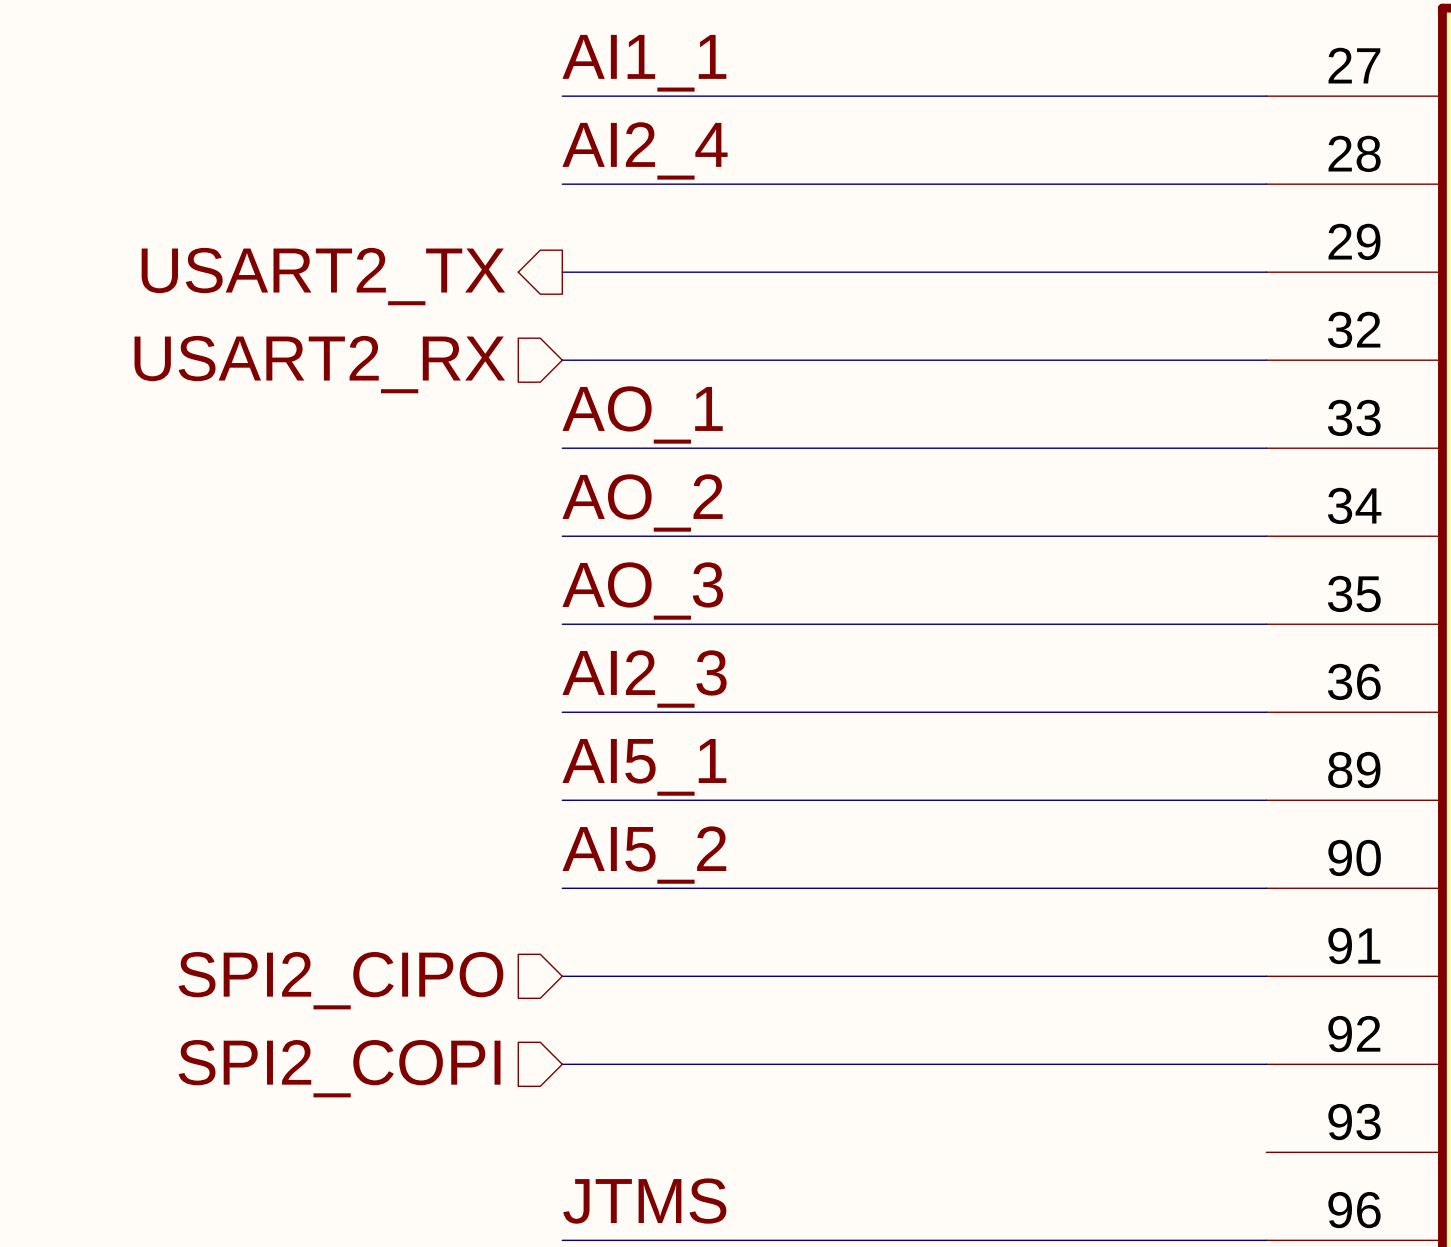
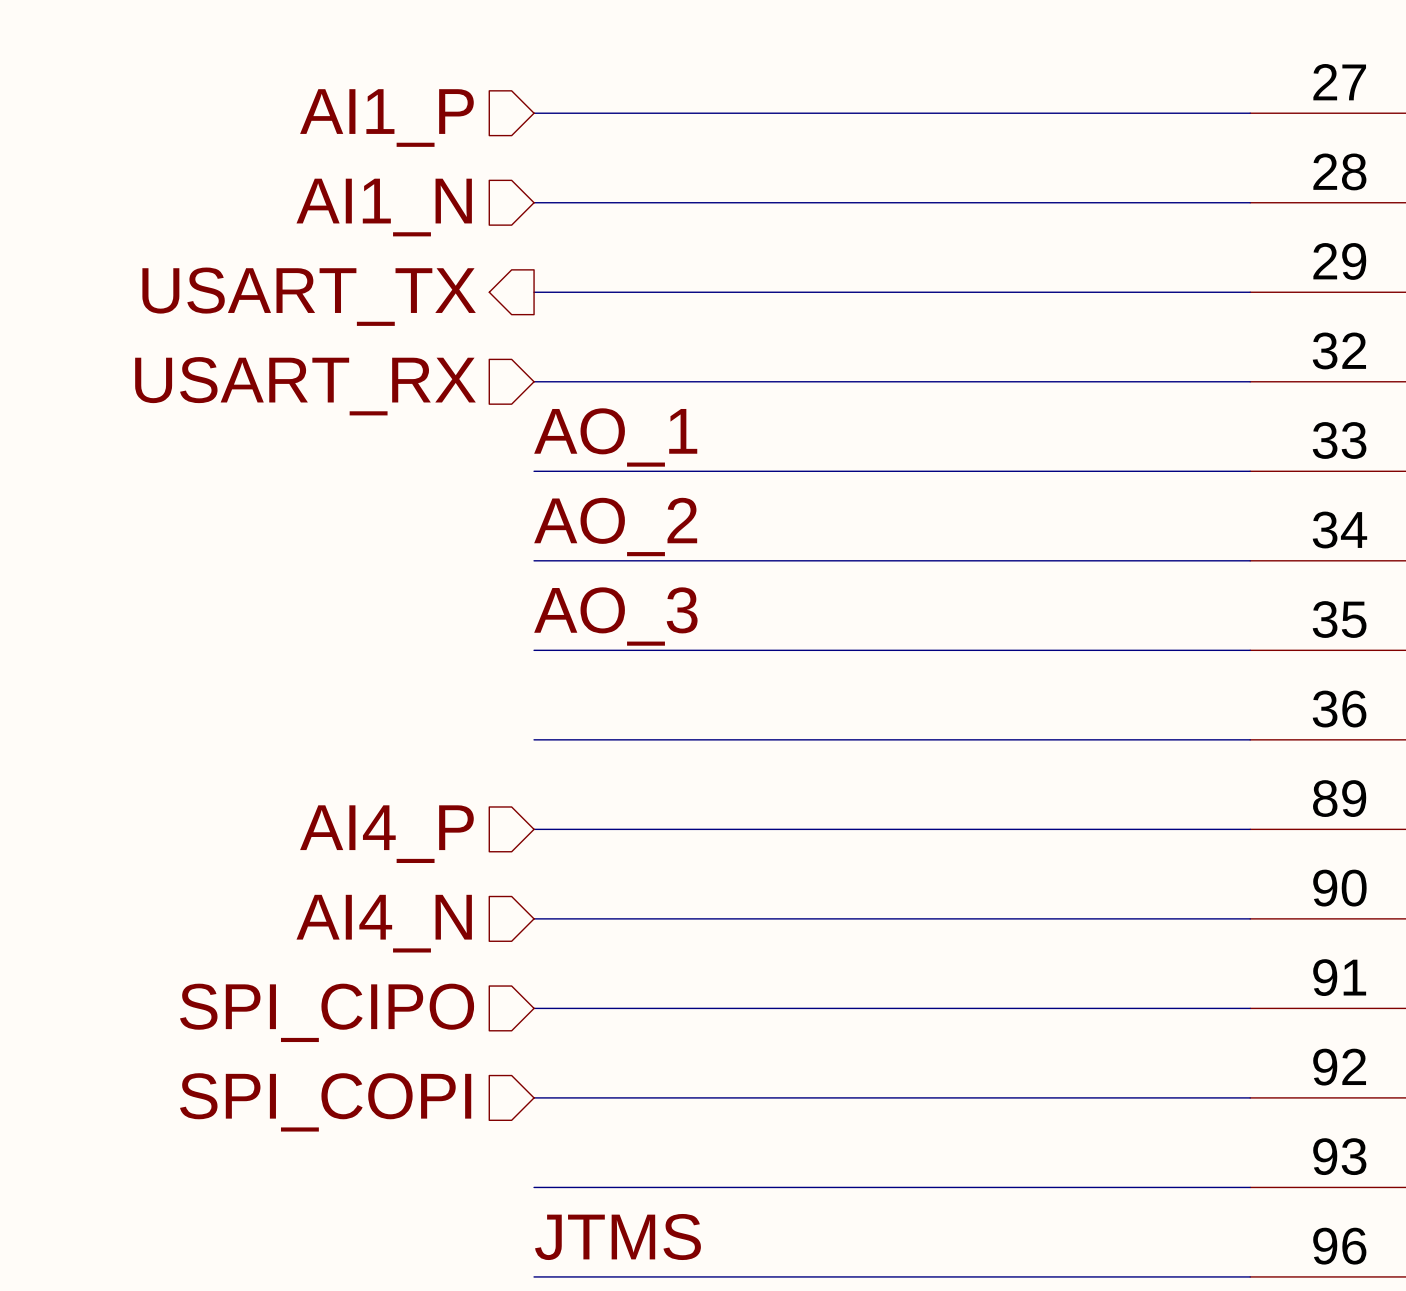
label: AI1_1 (644, 63) -> none
hierarchical label: none -> AI1_P (386, 118)
label: AI2_4 (645, 150) -> none
hierarchical label: none -> AI1_N (384, 207)
hierarchical label: USART2_TX (323, 276) -> USART_TX (309, 296)
hierarchical label: USART2_RX (319, 364) -> USART_RX (305, 386)
label: AI2_3 (644, 679) -> none
label: AI5_1 (644, 767) -> none
hierarchical label: none -> AI4_P (386, 834)
label: AI5_2 (644, 855) -> none
hierarchical label: none -> AI4_N (384, 923)
hierarchical label: SPI2_CIPO (341, 980) -> SPI_CIPO (327, 1012)
hierarchical label: SPI2_COPI (339, 1068) -> SPI_COPI (325, 1102)
wire: none -> (534, 1187) (1250, 1187)

